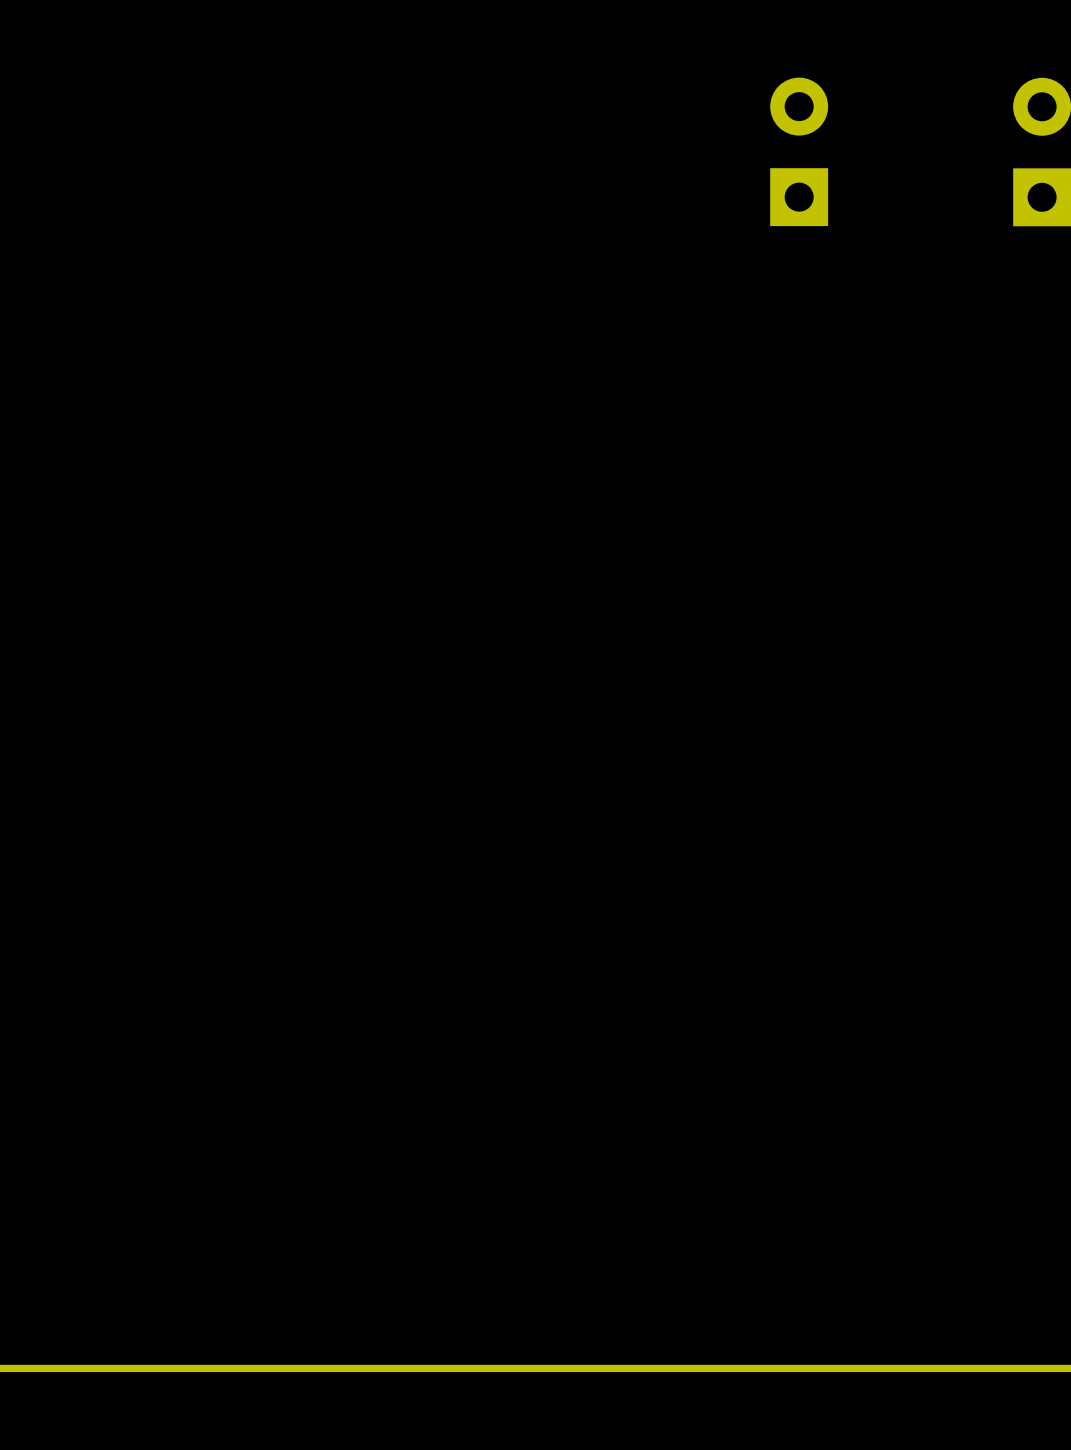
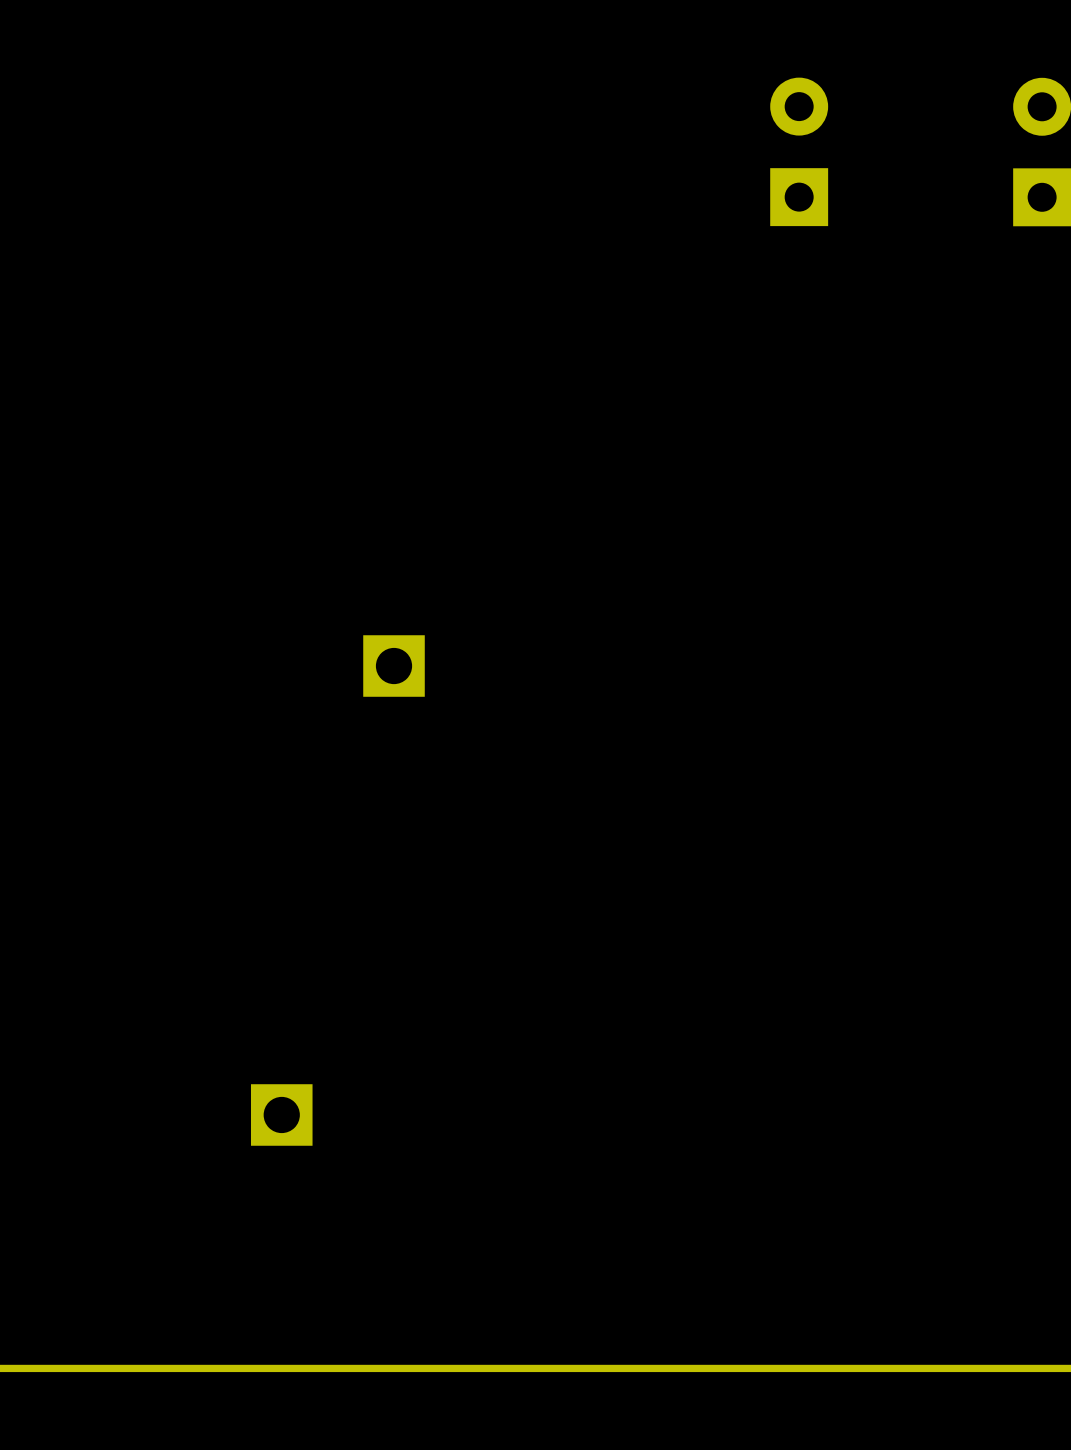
part: none -> (394, 666)
part: none -> (281, 1114)

